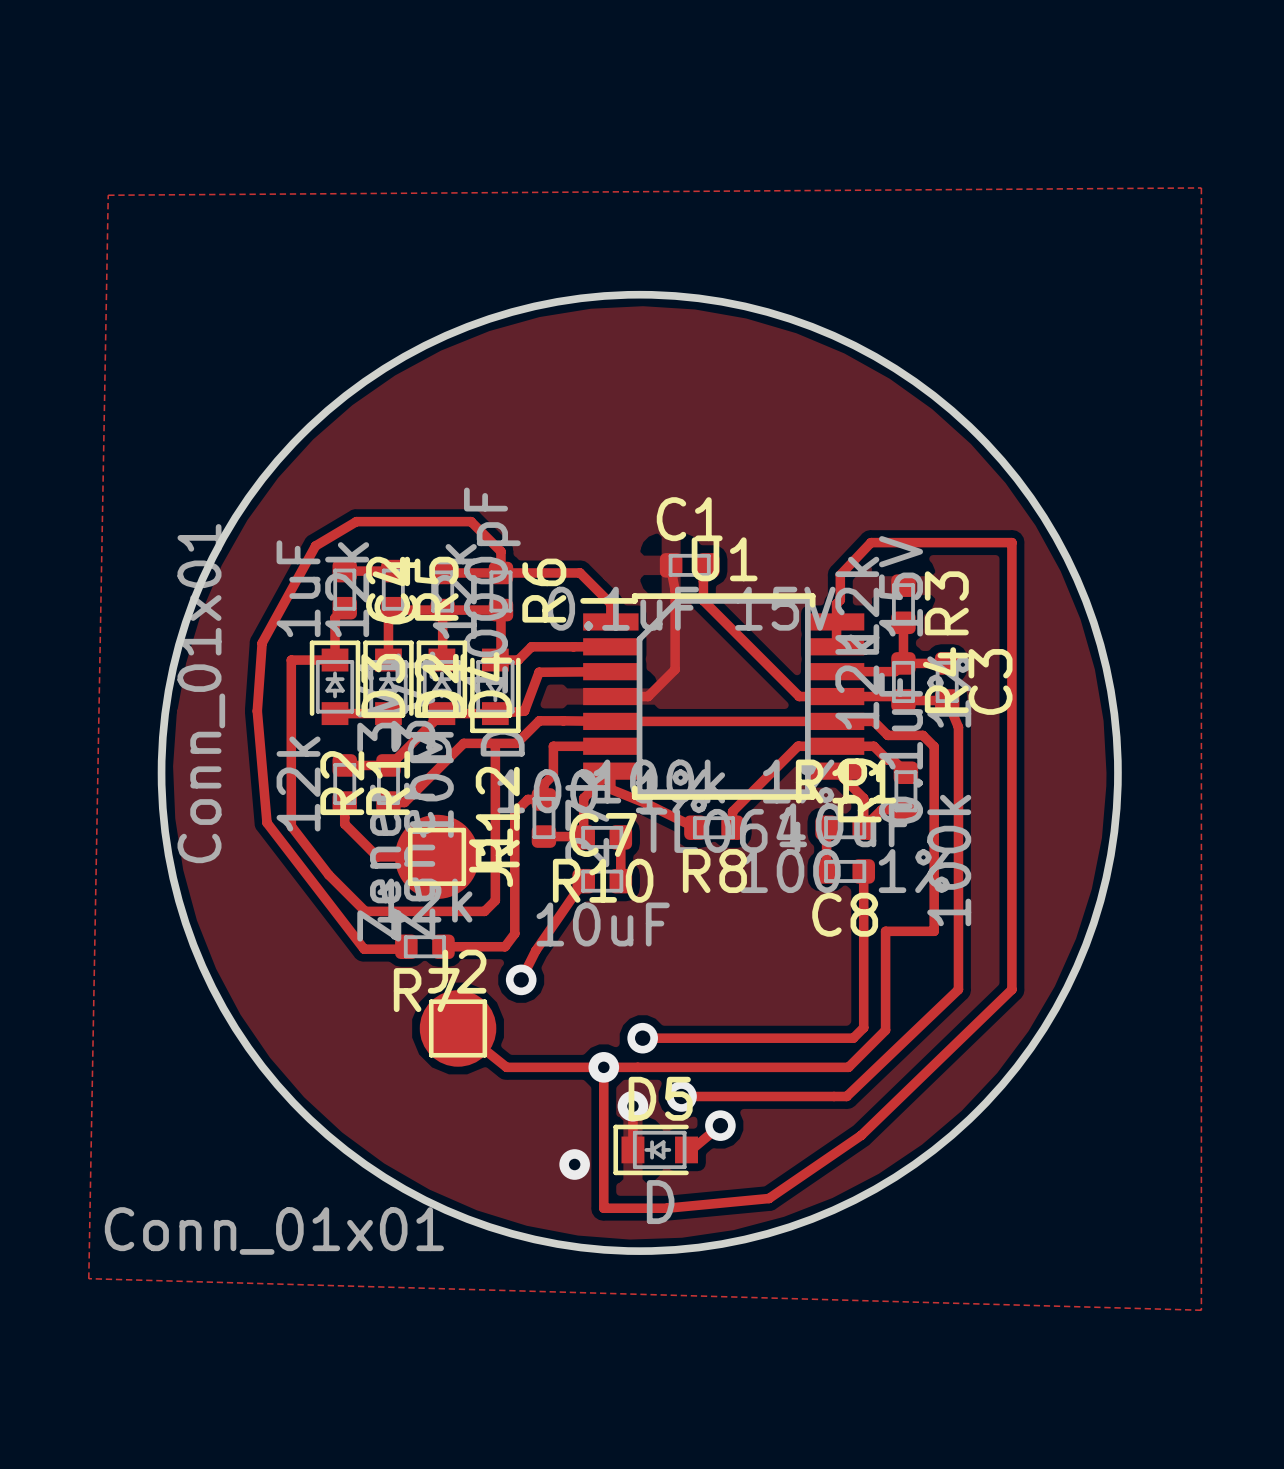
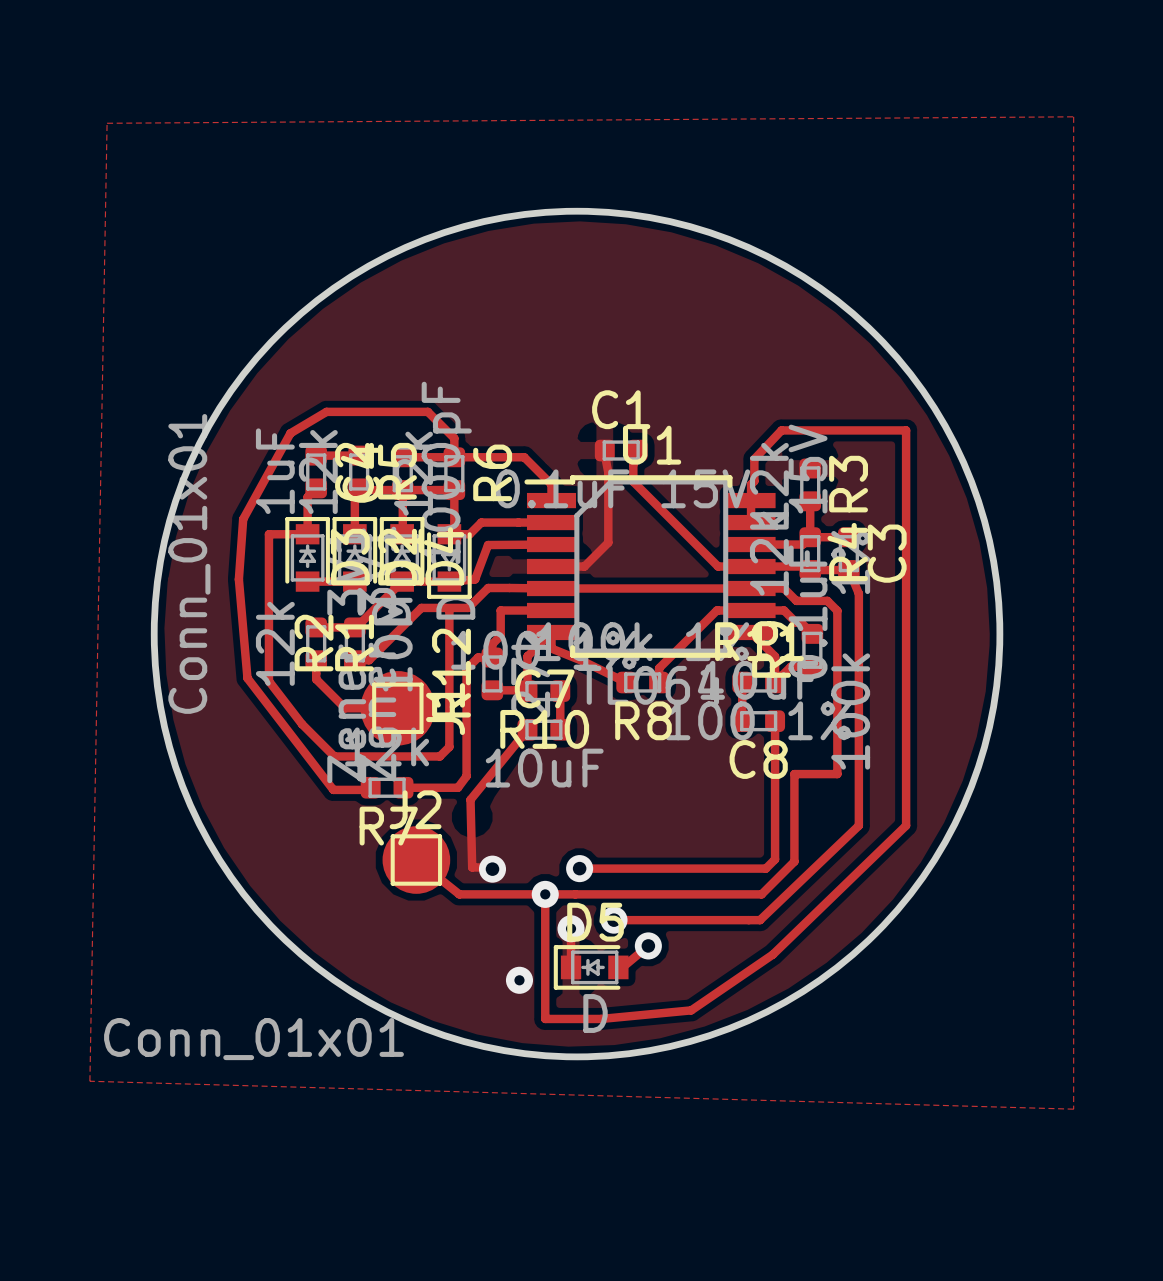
track: (583, 881) (535, 950) (521, 979) -> (527, 729) (470, 799) (472, 867) (490, 867) (492, 869)
via position: (521, 979) -> (492, 869)

